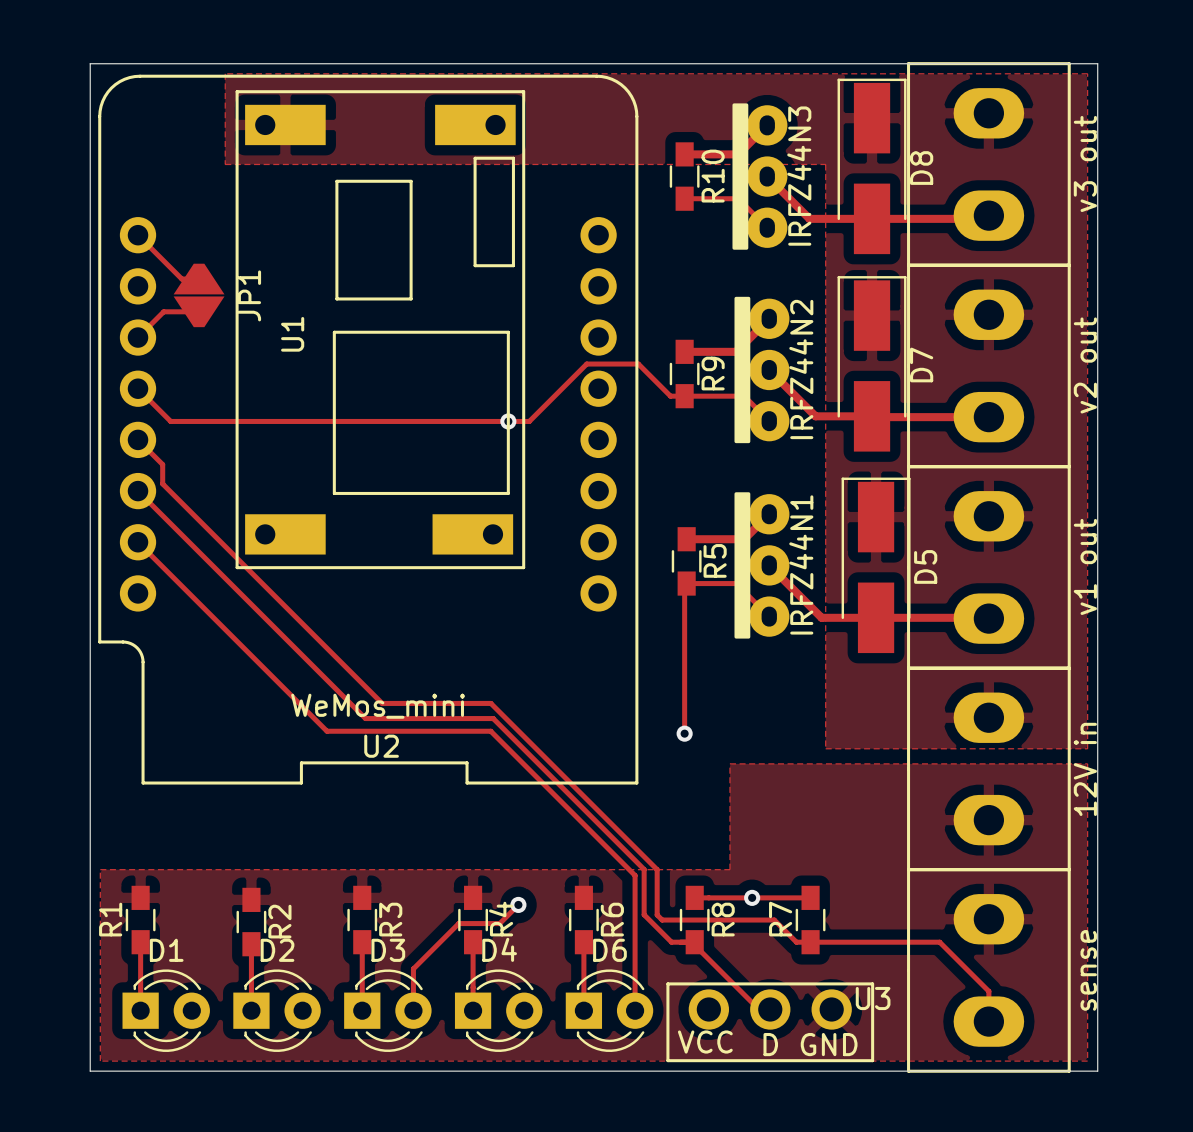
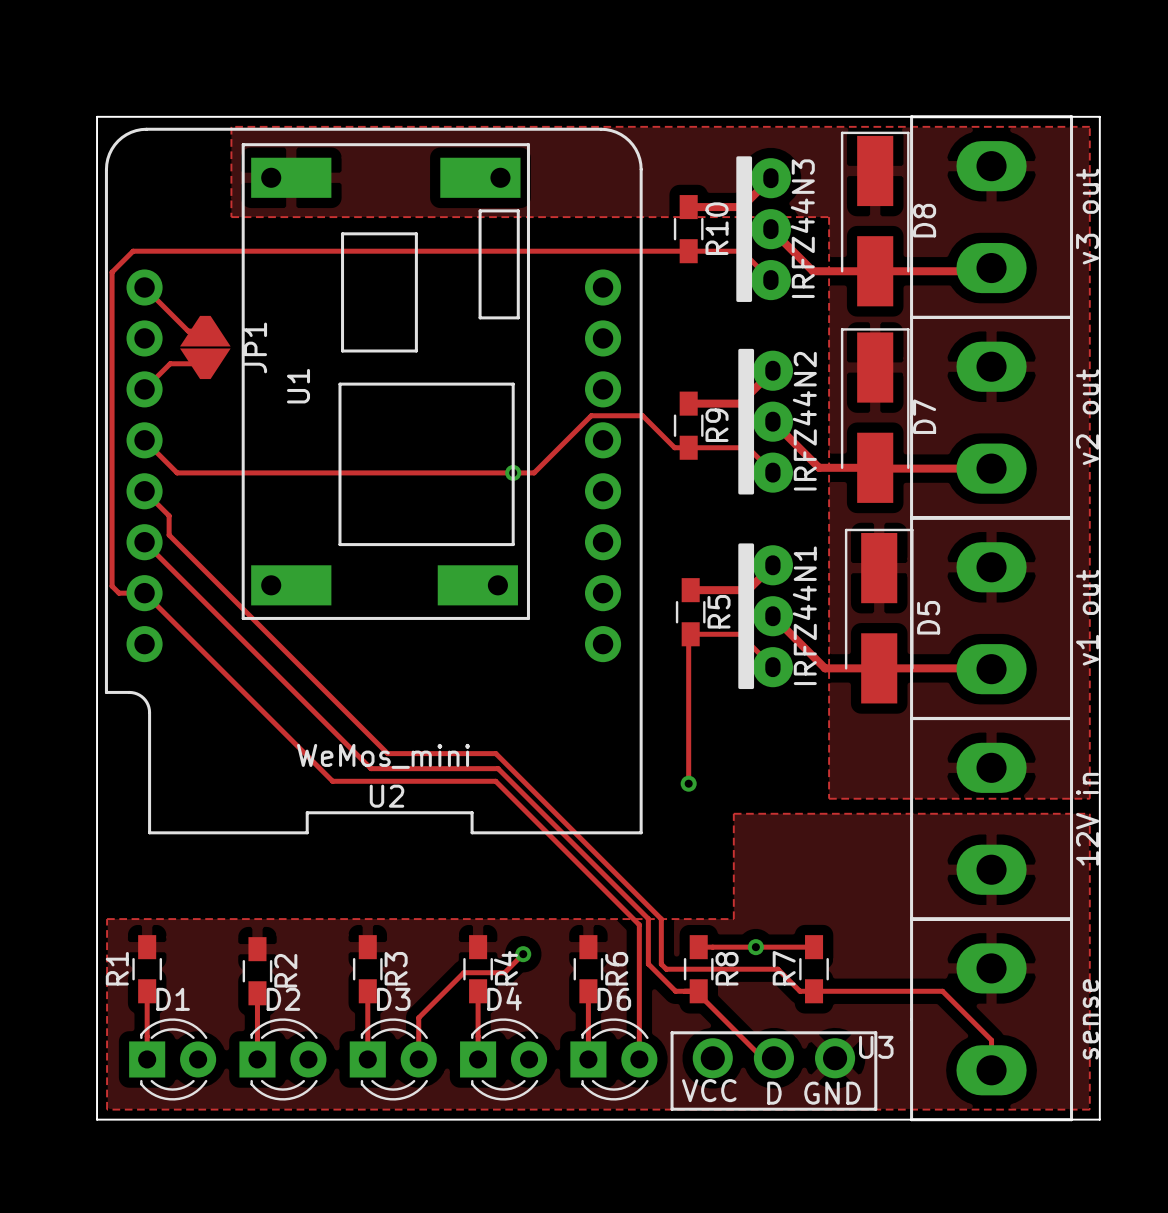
track: none -> (688, 251) (133, 251) (112, 272) (112, 586) (119, 593) (144, 593)

